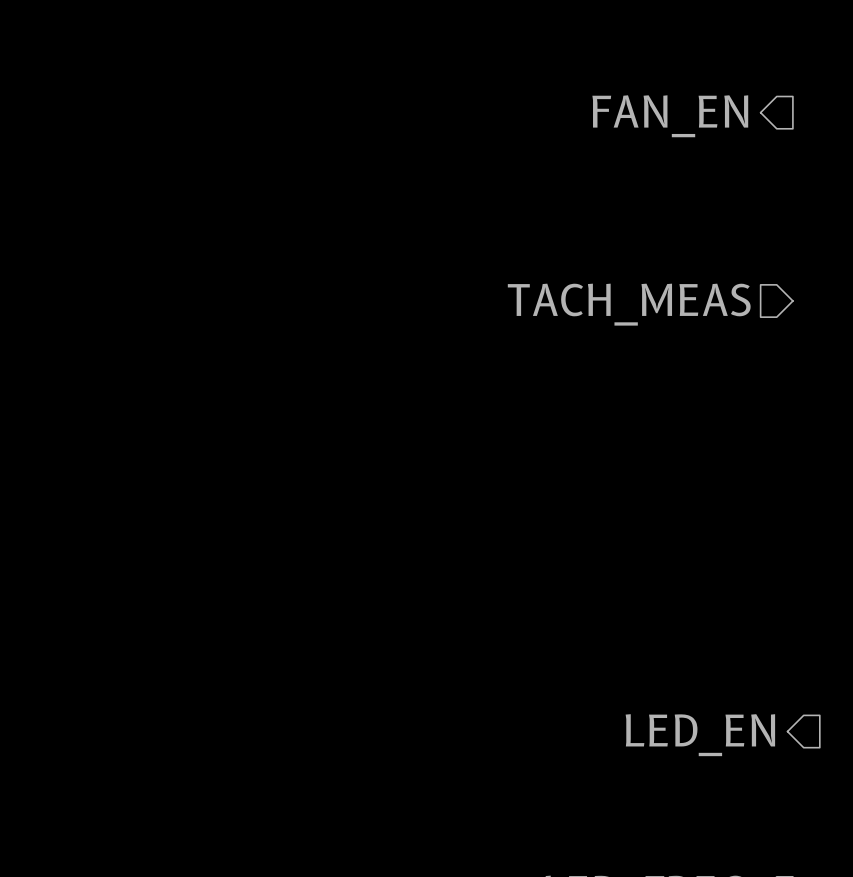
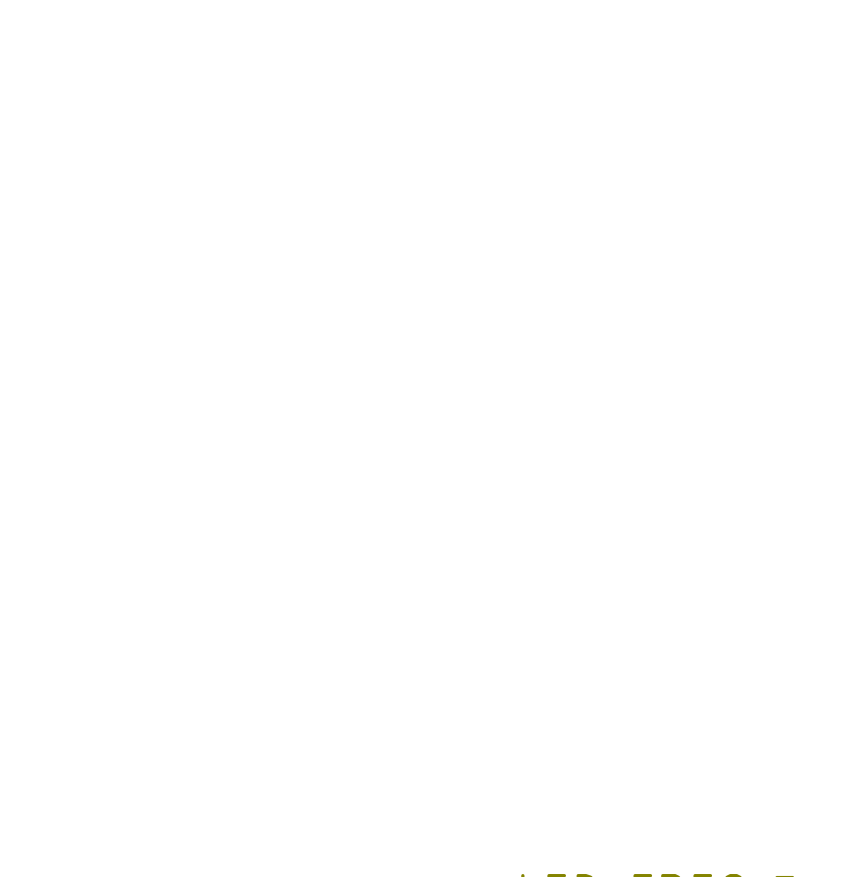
hierarchical label: FAN_EN (670, 116) -> none
hierarchical label: TACH_MEAS (629, 304) -> none
hierarchical label: LED_EN (700, 735) -> none

